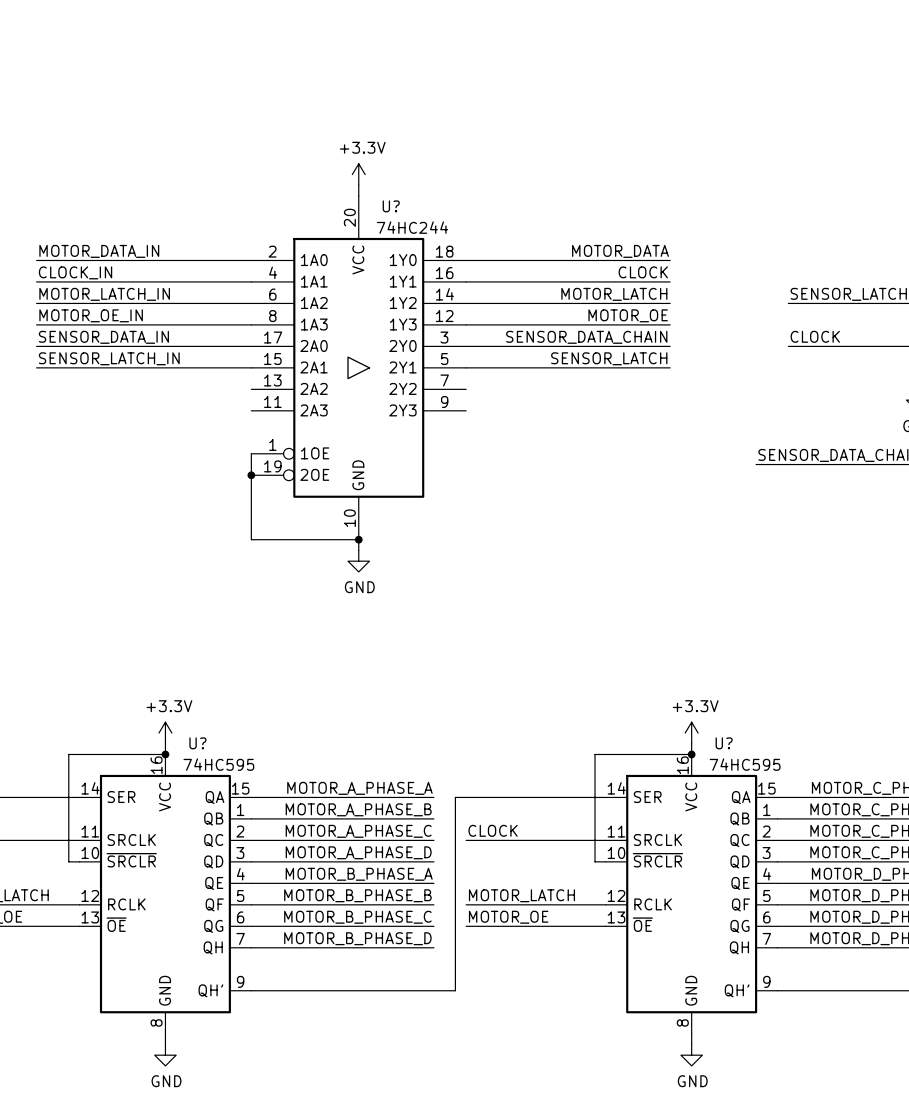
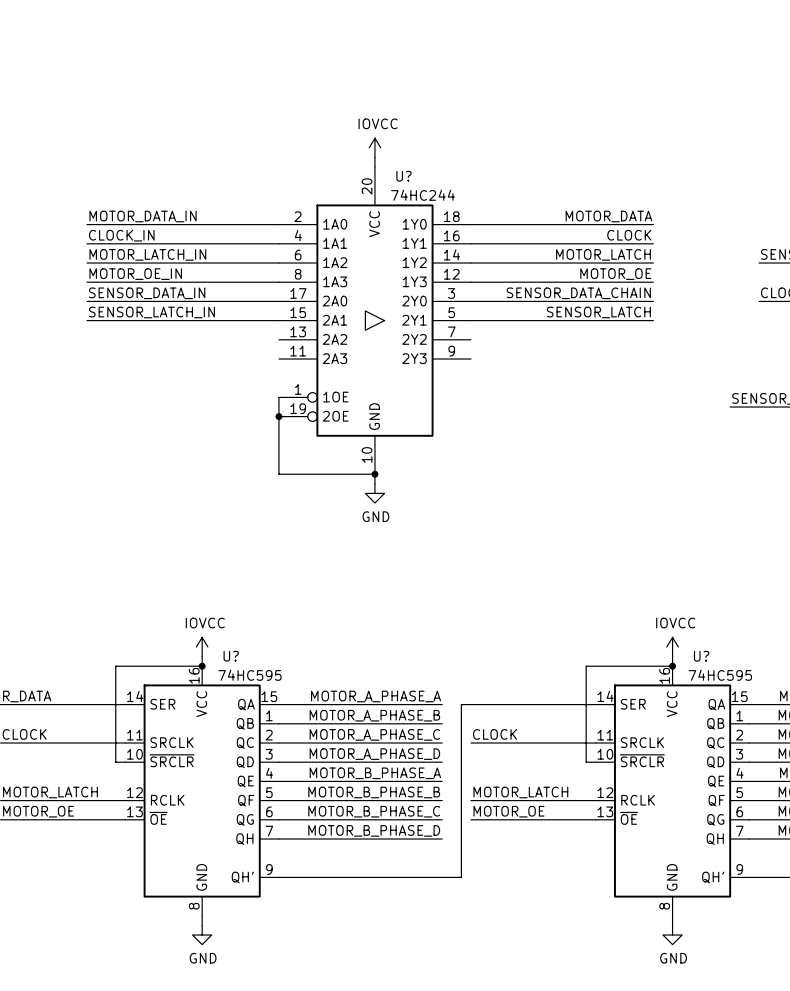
power symbol: +3.3V (358, 174) -> IOVCC (374, 147)
power symbol: +3.3V (165, 733) -> IOVCC (202, 647)
power symbol: +3.3V (691, 733) -> IOVCC (672, 647)

